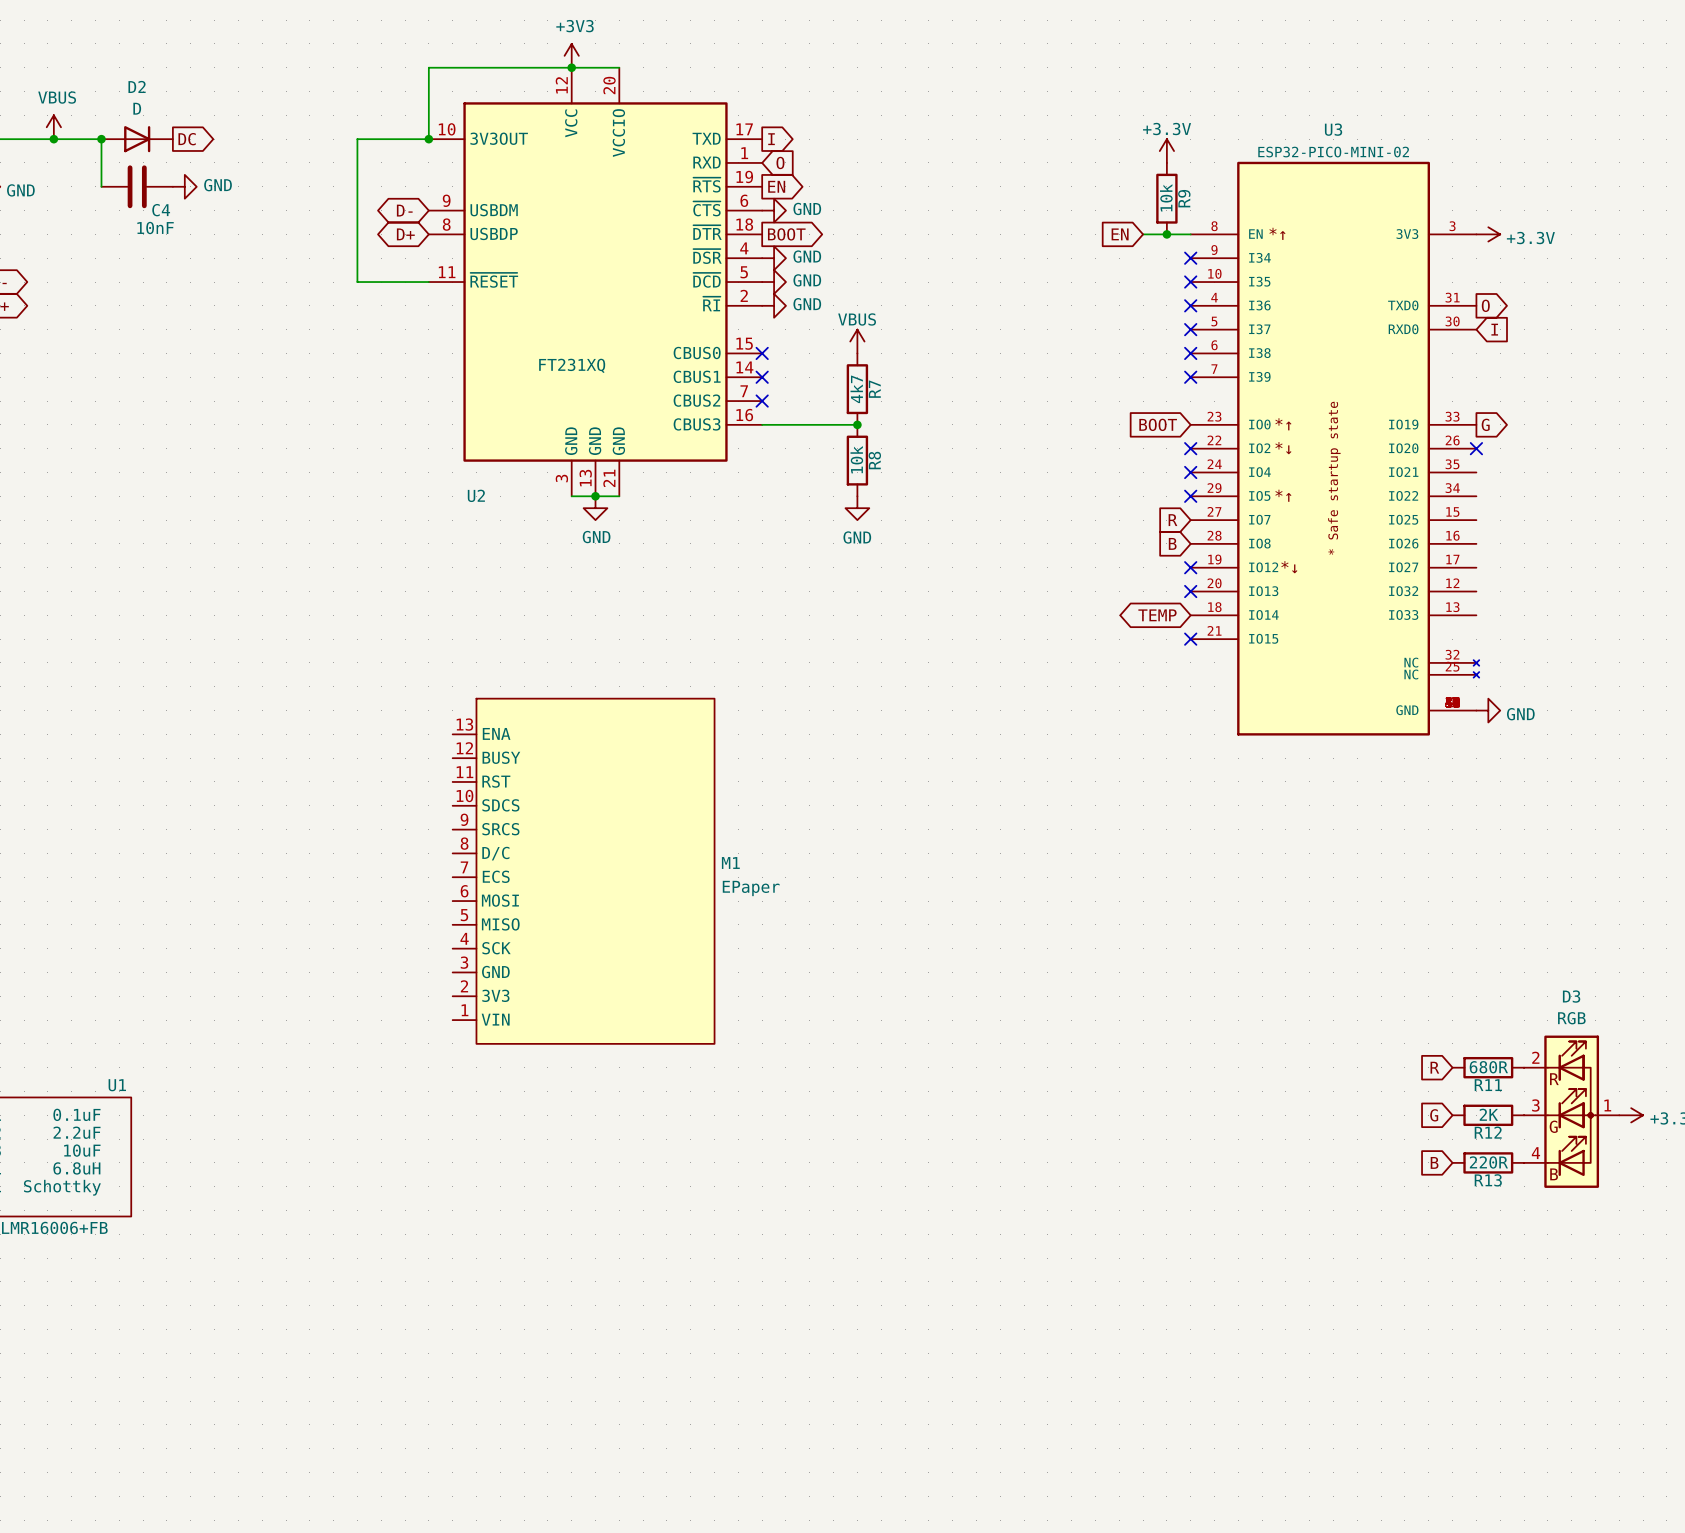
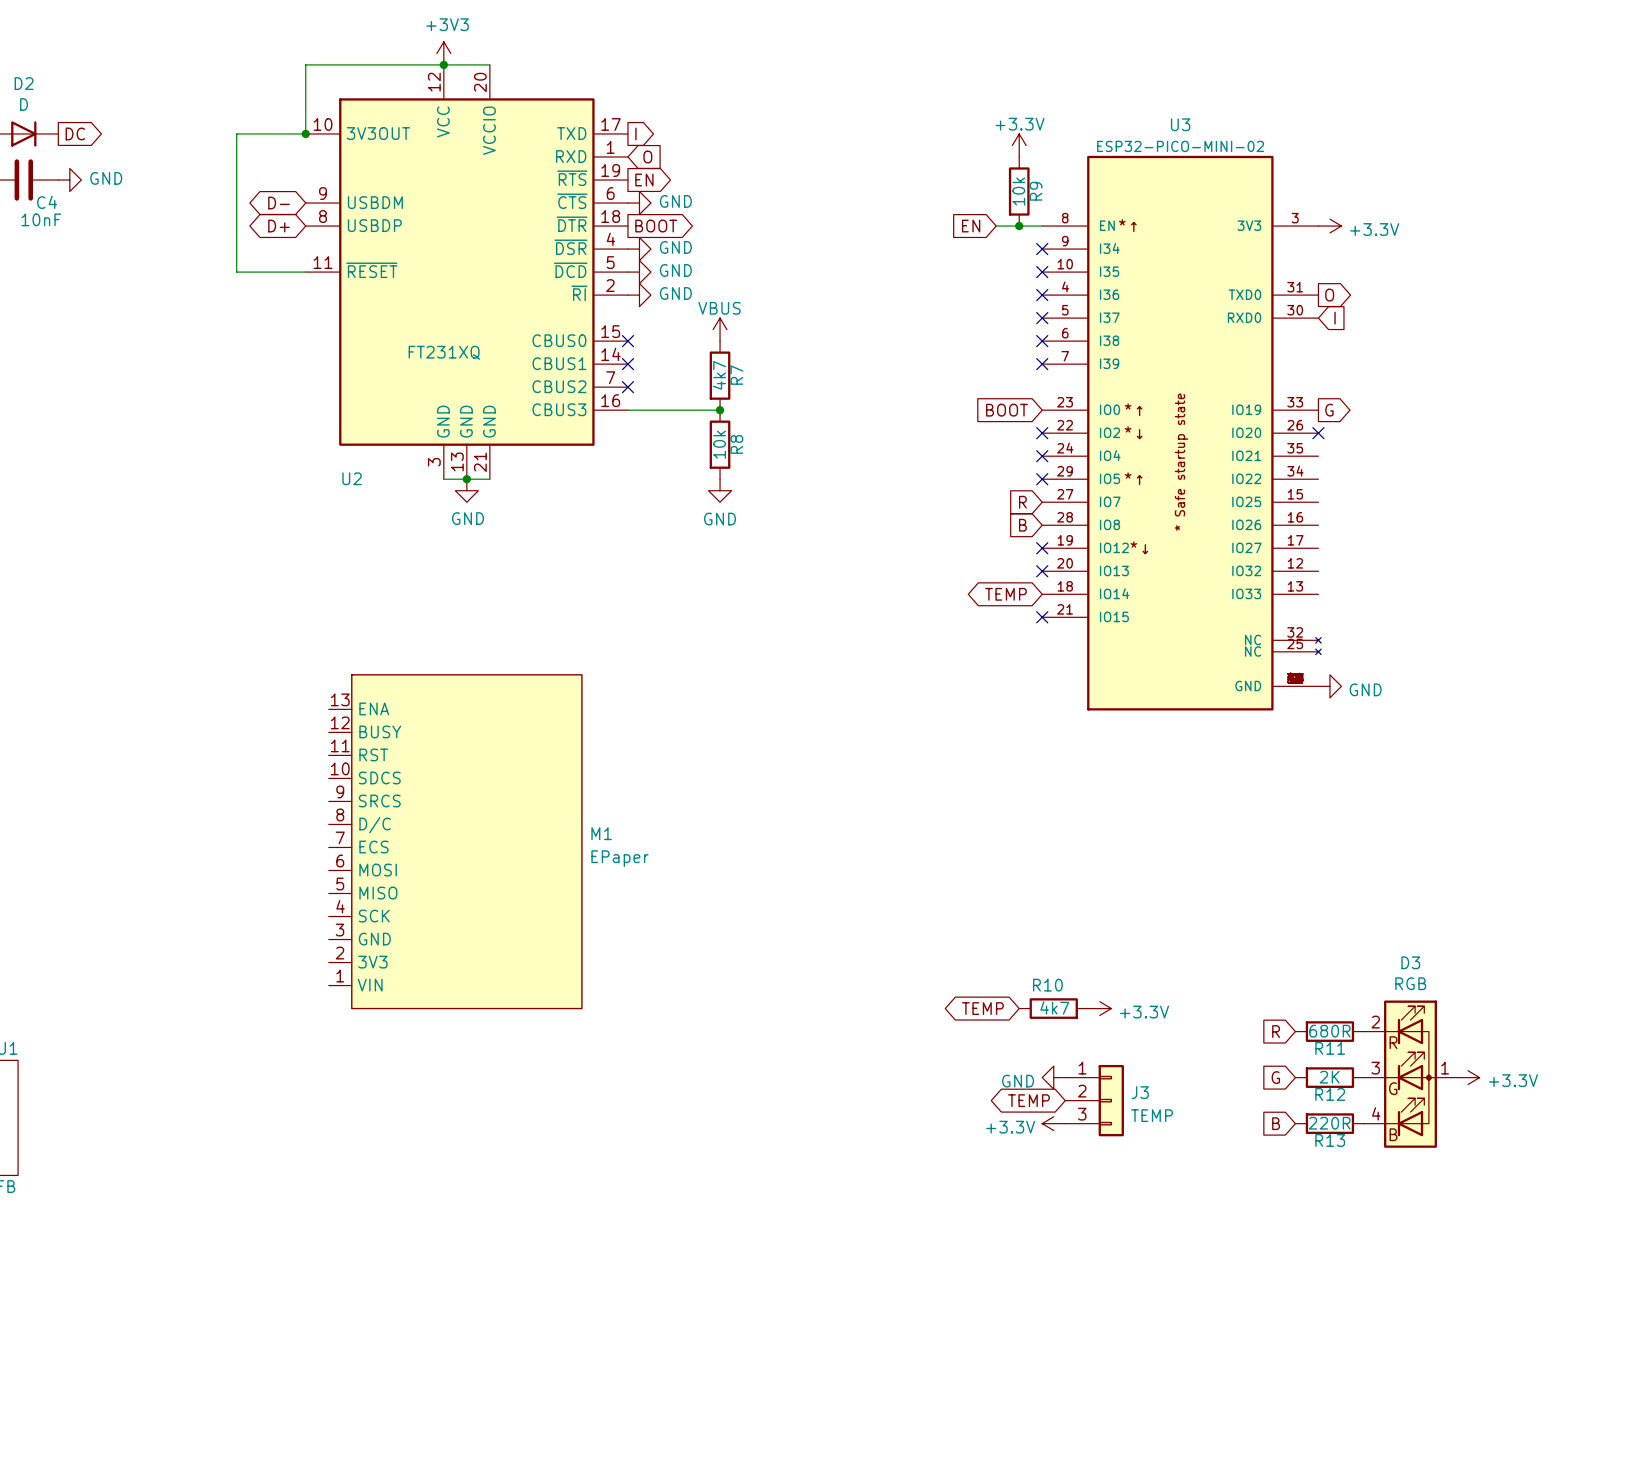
global label: none -> TEMP (982, 1008)
R10: none -> 4k7 (1053, 1008)
power symbol: none -> +3.3V (1099, 1008)
power symbol: none -> GND (1053, 1077)
global label: none -> TEMP (1028, 1100)
J3: none -> TEMP (1094, 1100)
power symbol: none -> +3.3V (1053, 1123)

